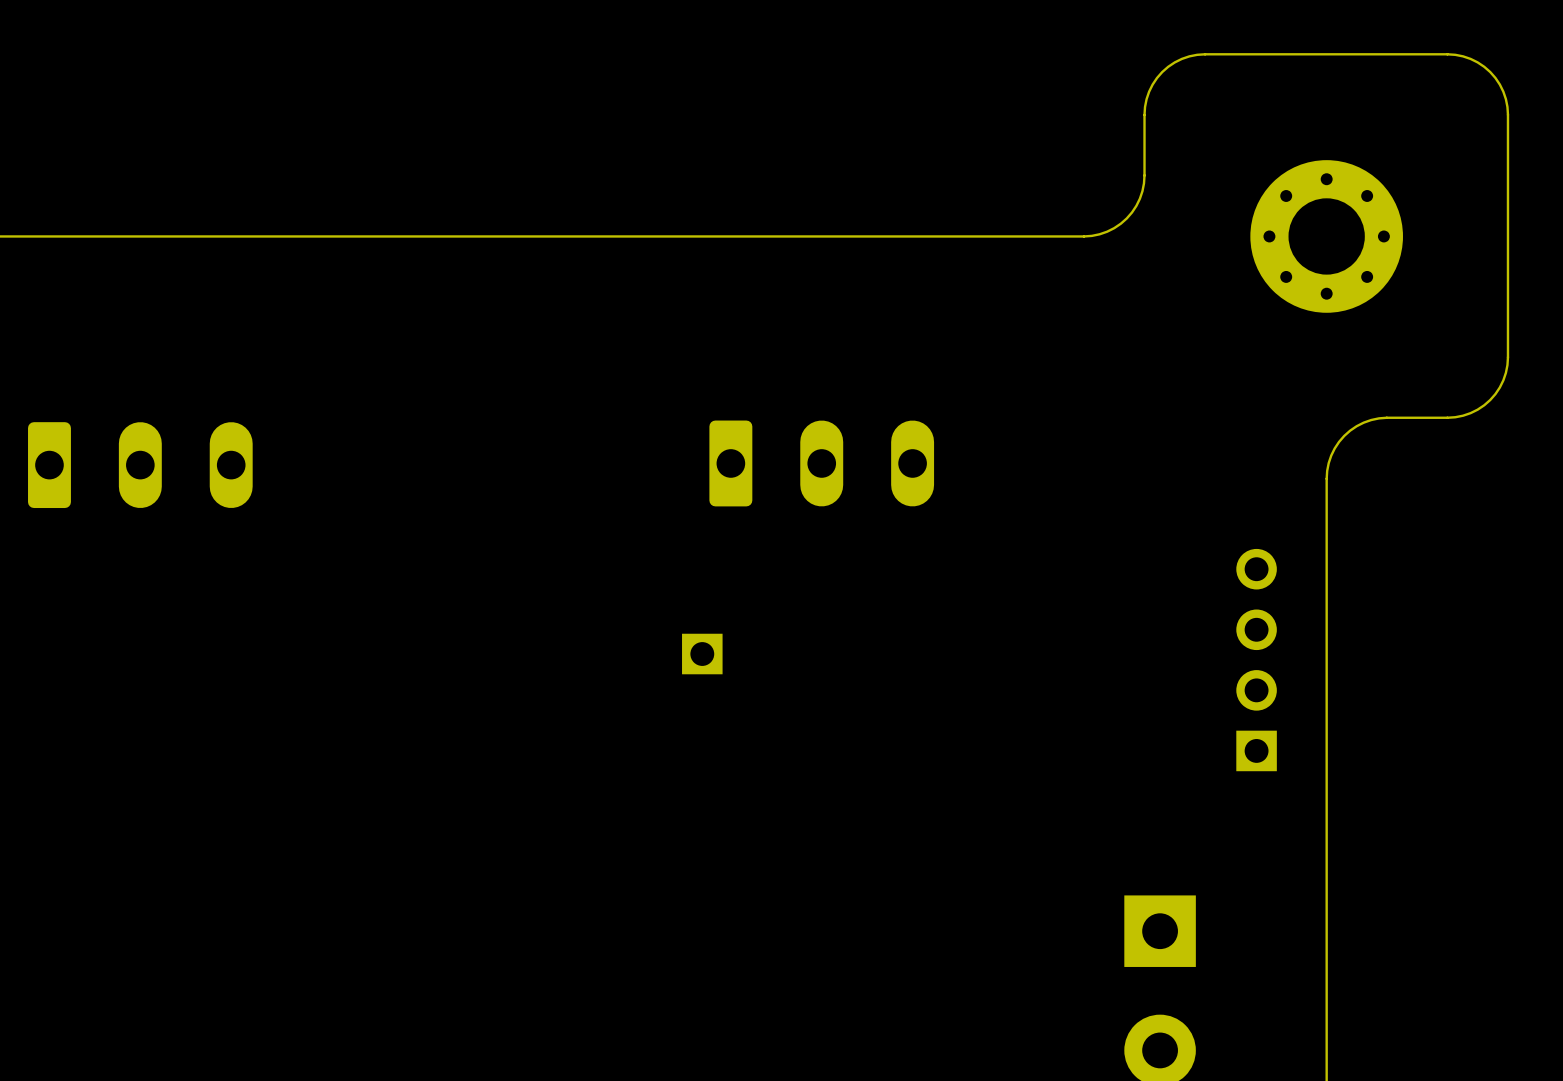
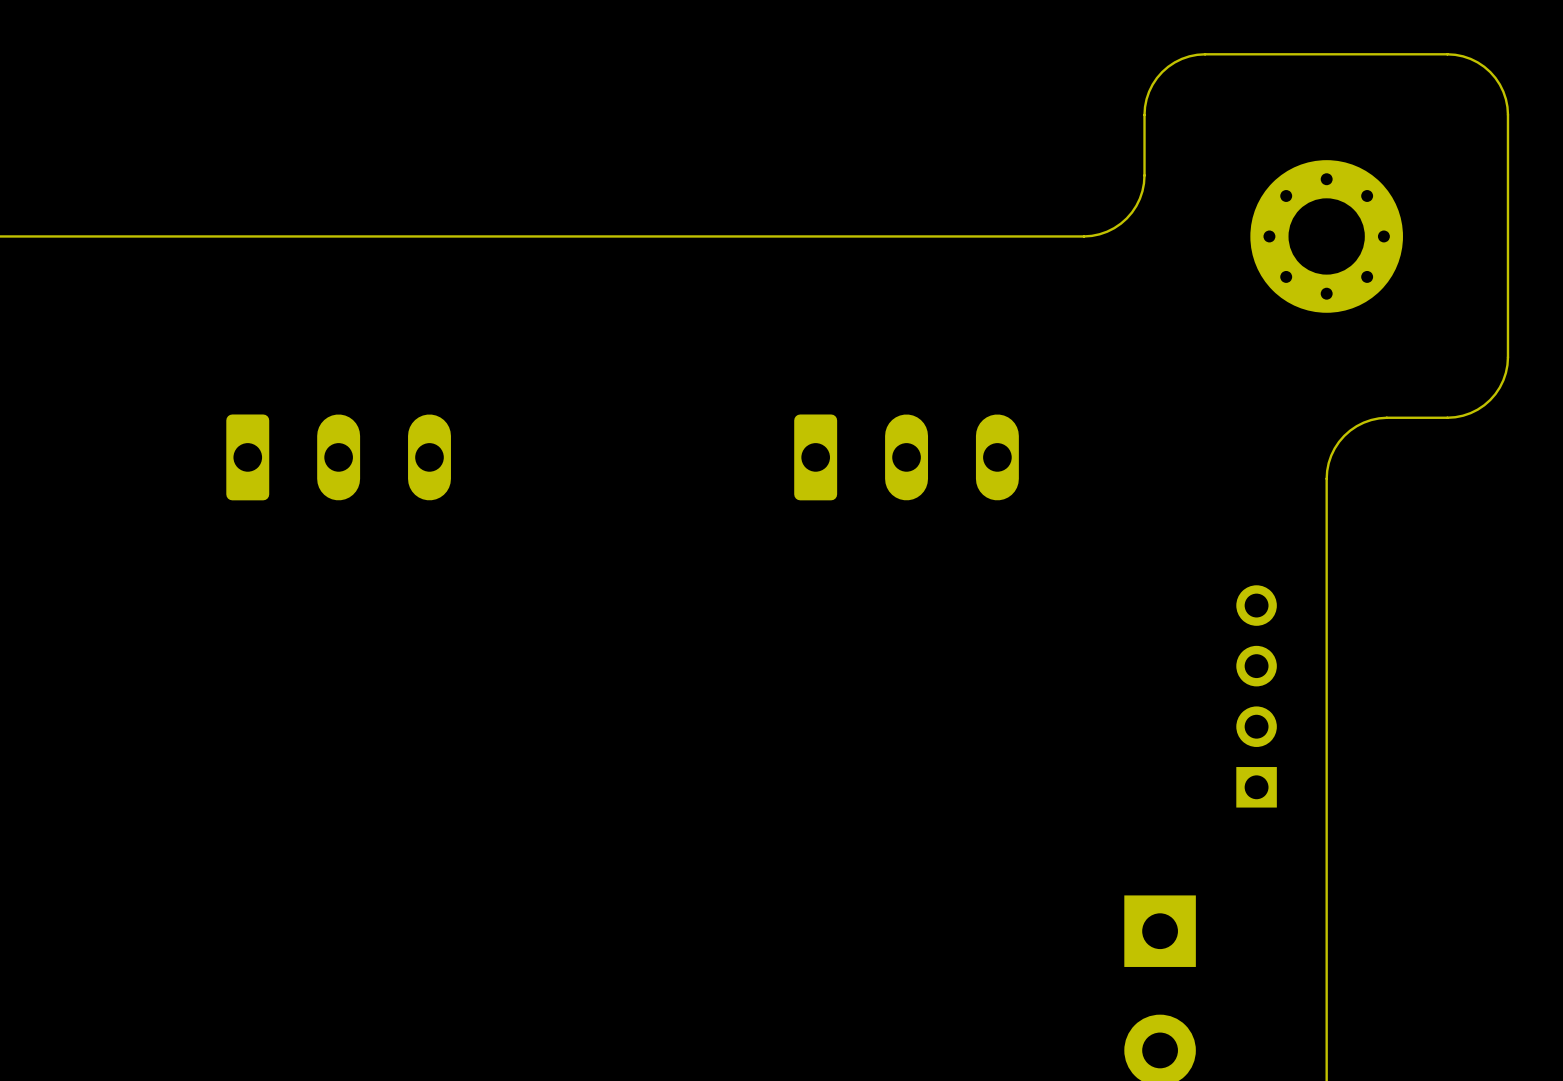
part position: (821, 463) -> (906, 457)
part position: (140, 465) -> (338, 457)
part: (702, 654) -> none
part position: (1256, 660) -> (1256, 696)

